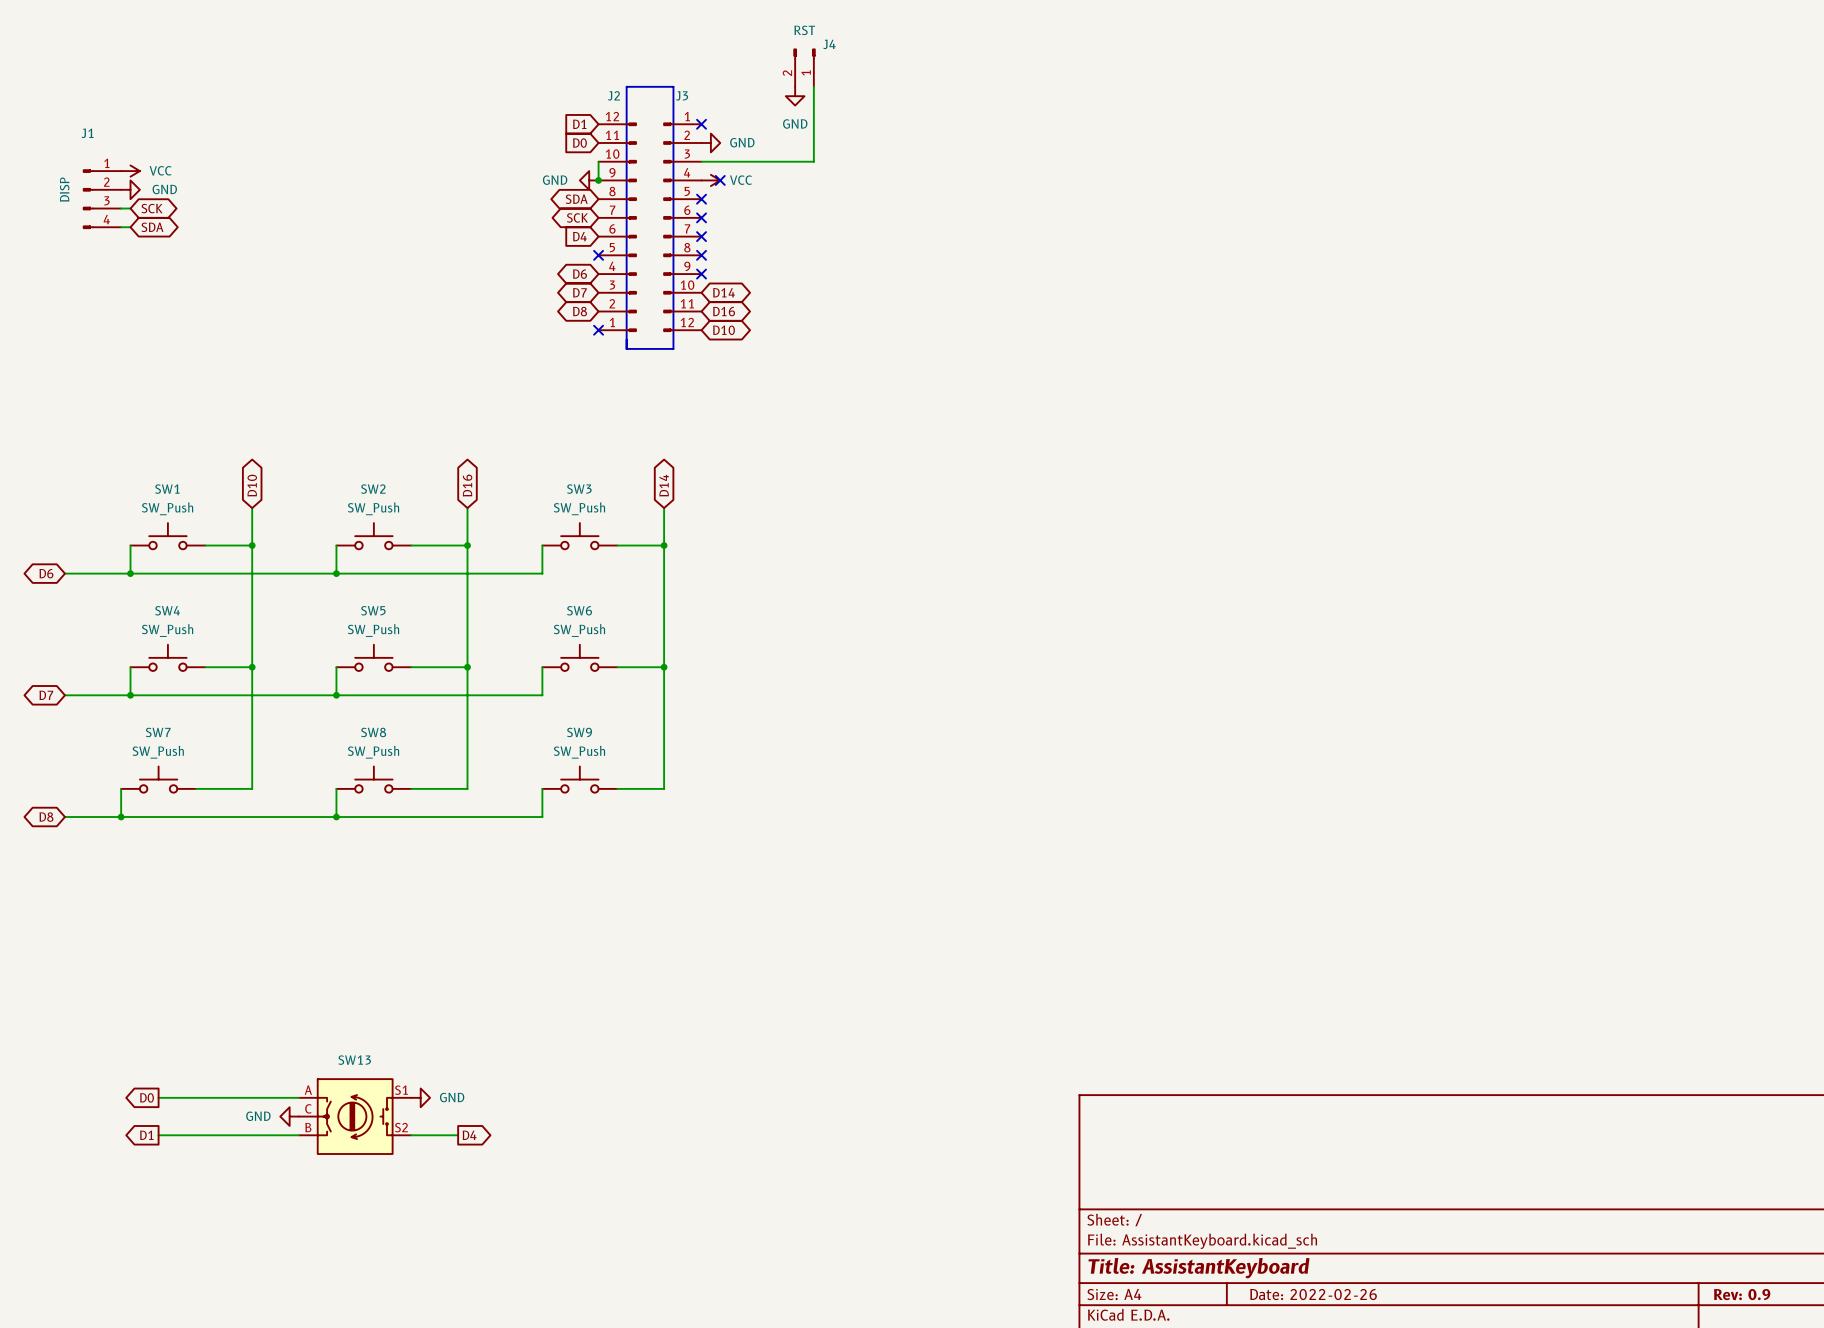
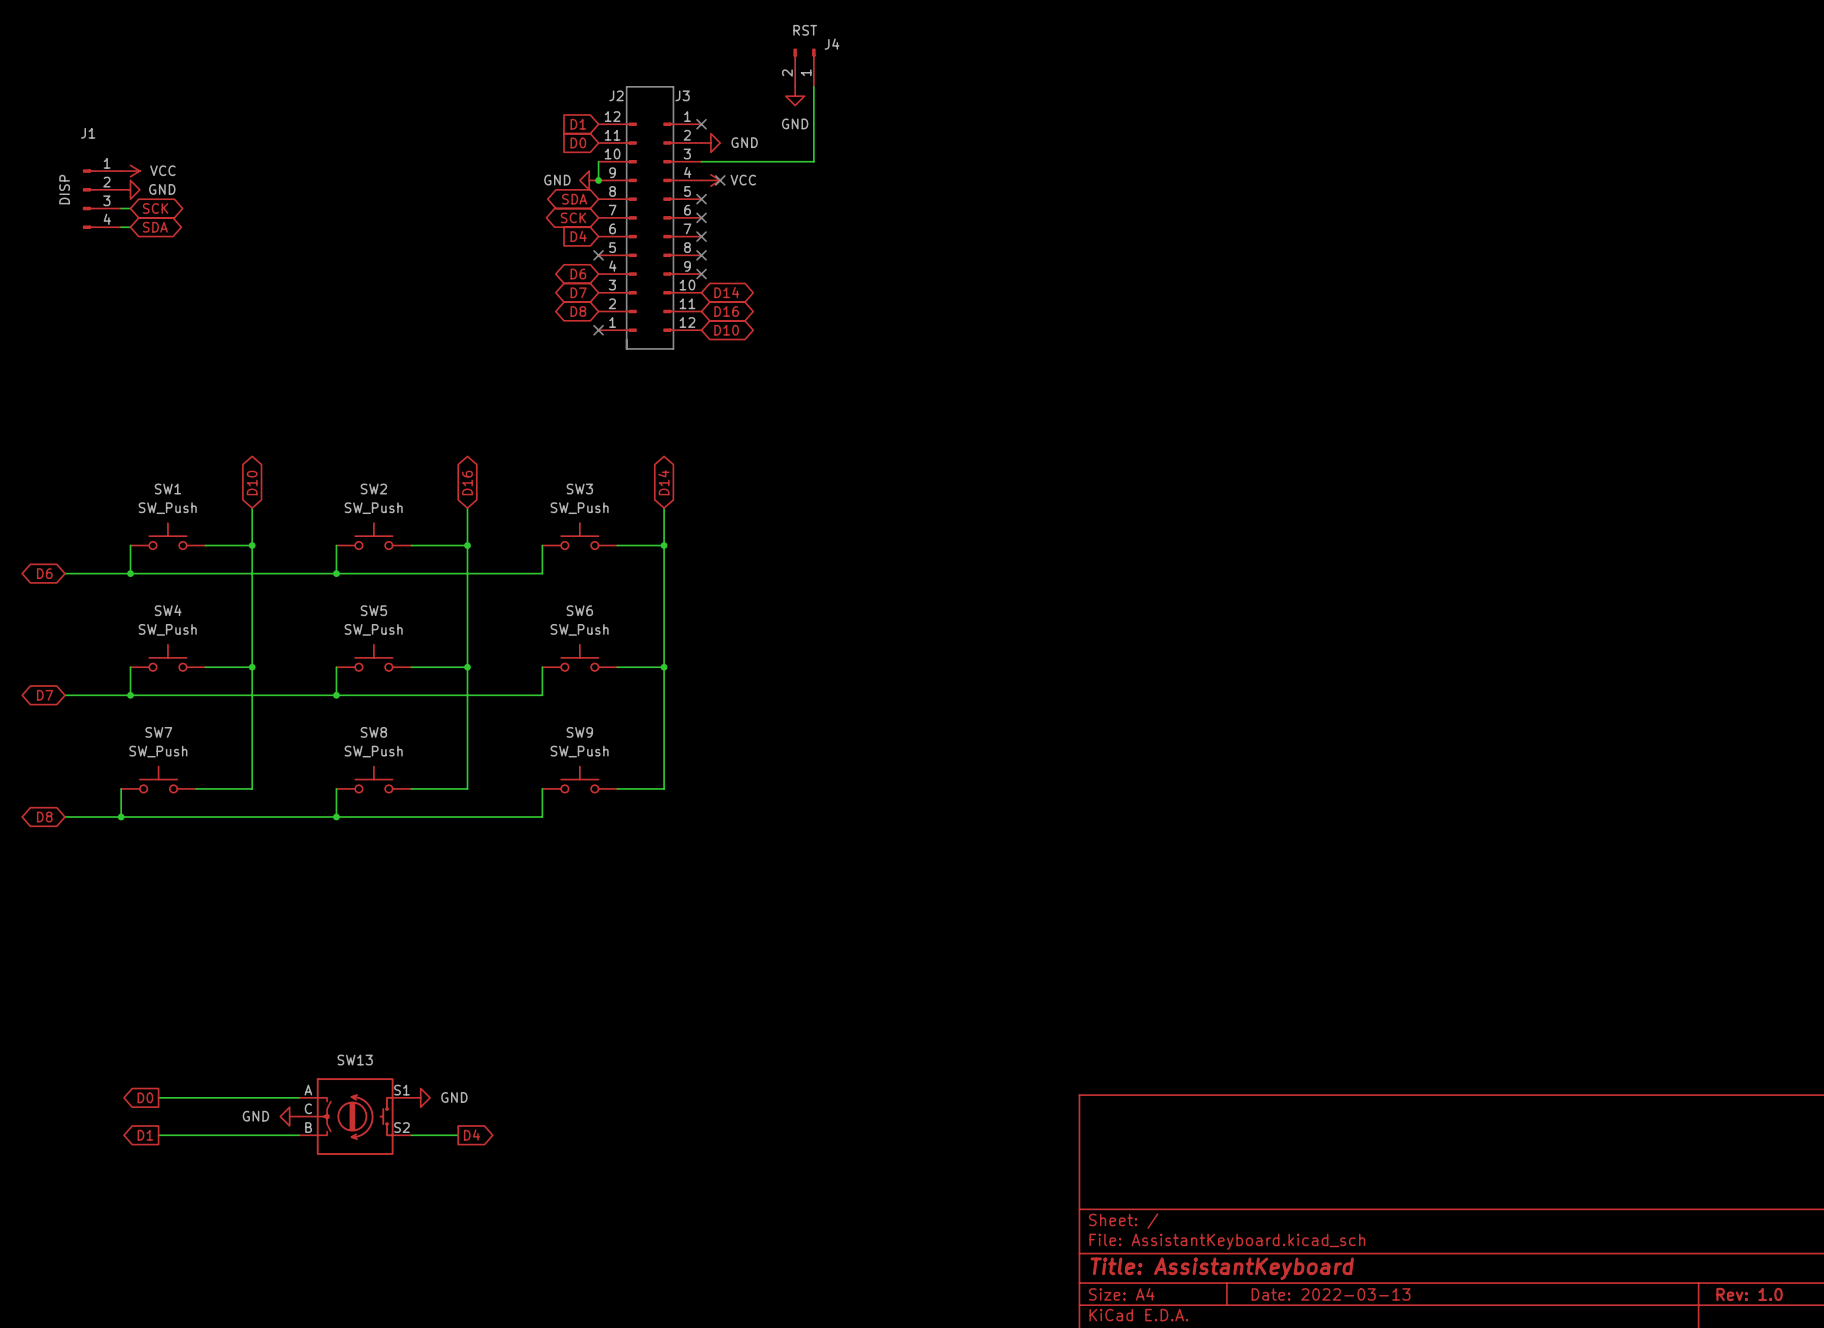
title block: Date: 2022-02-26 (1313, 1294) -> Date: 2022-03-13 (1331, 1294)
title block: Rev: 0.9 (1742, 1294) -> Rev: 1.0 (1749, 1294)

